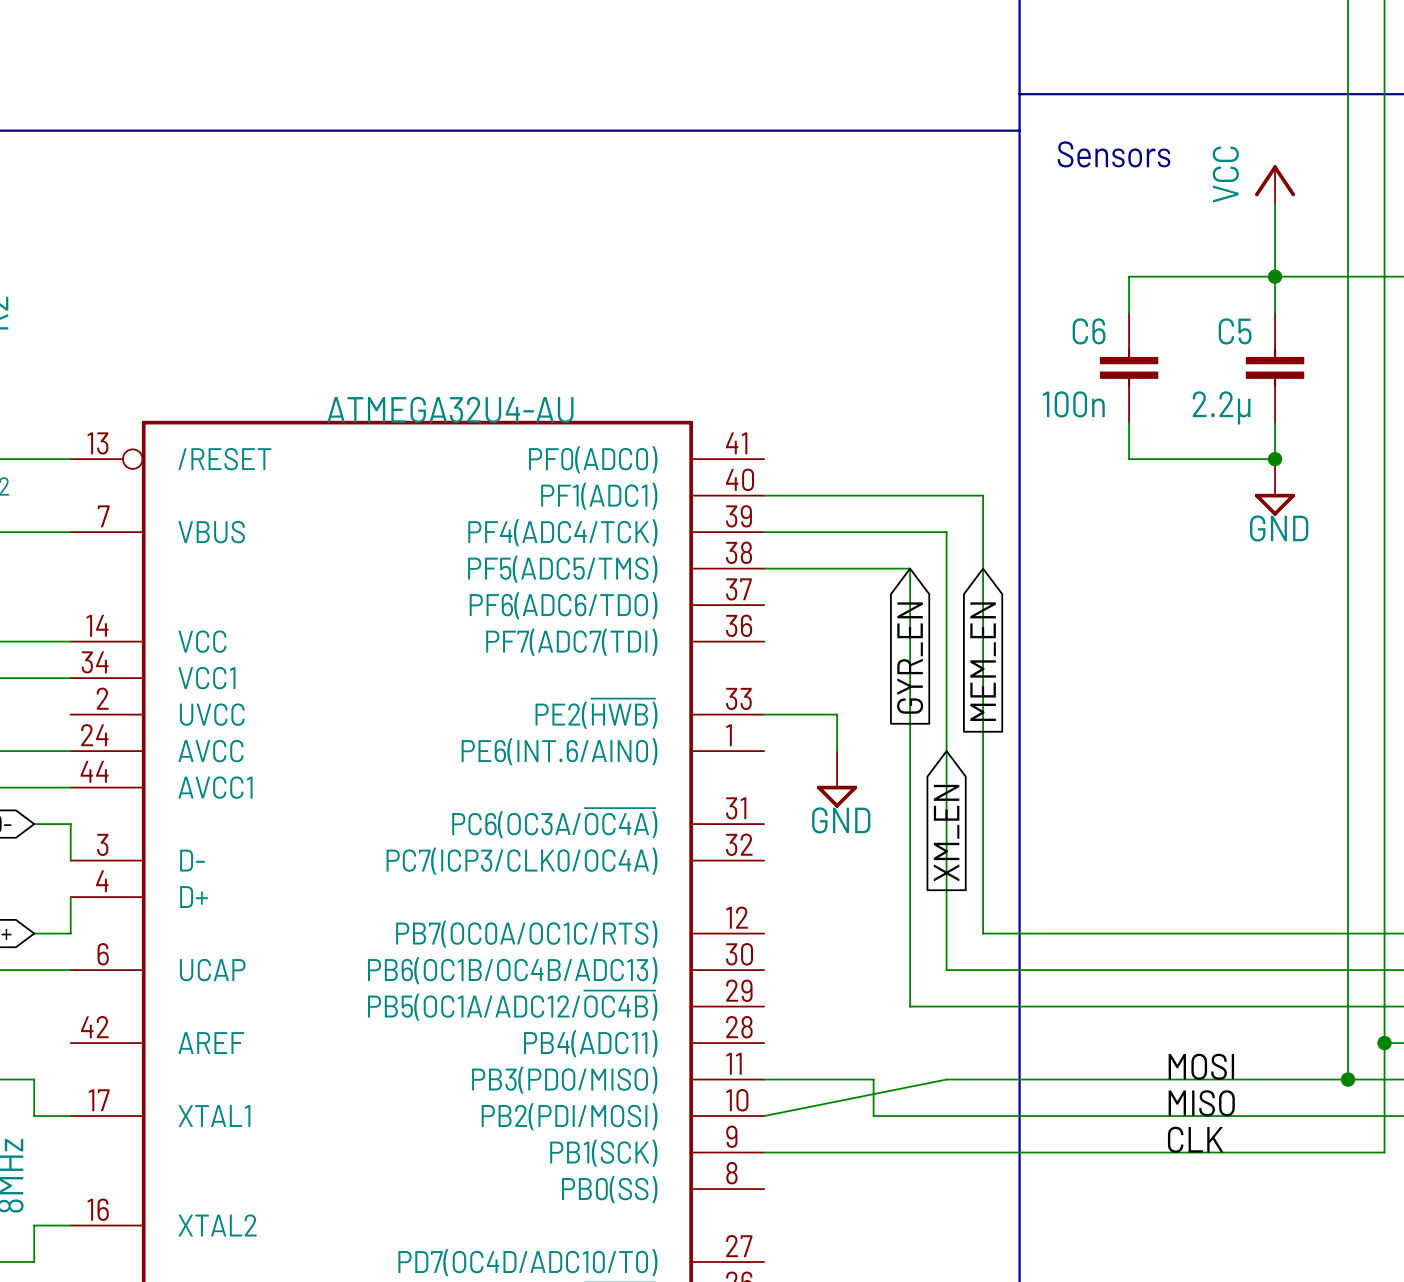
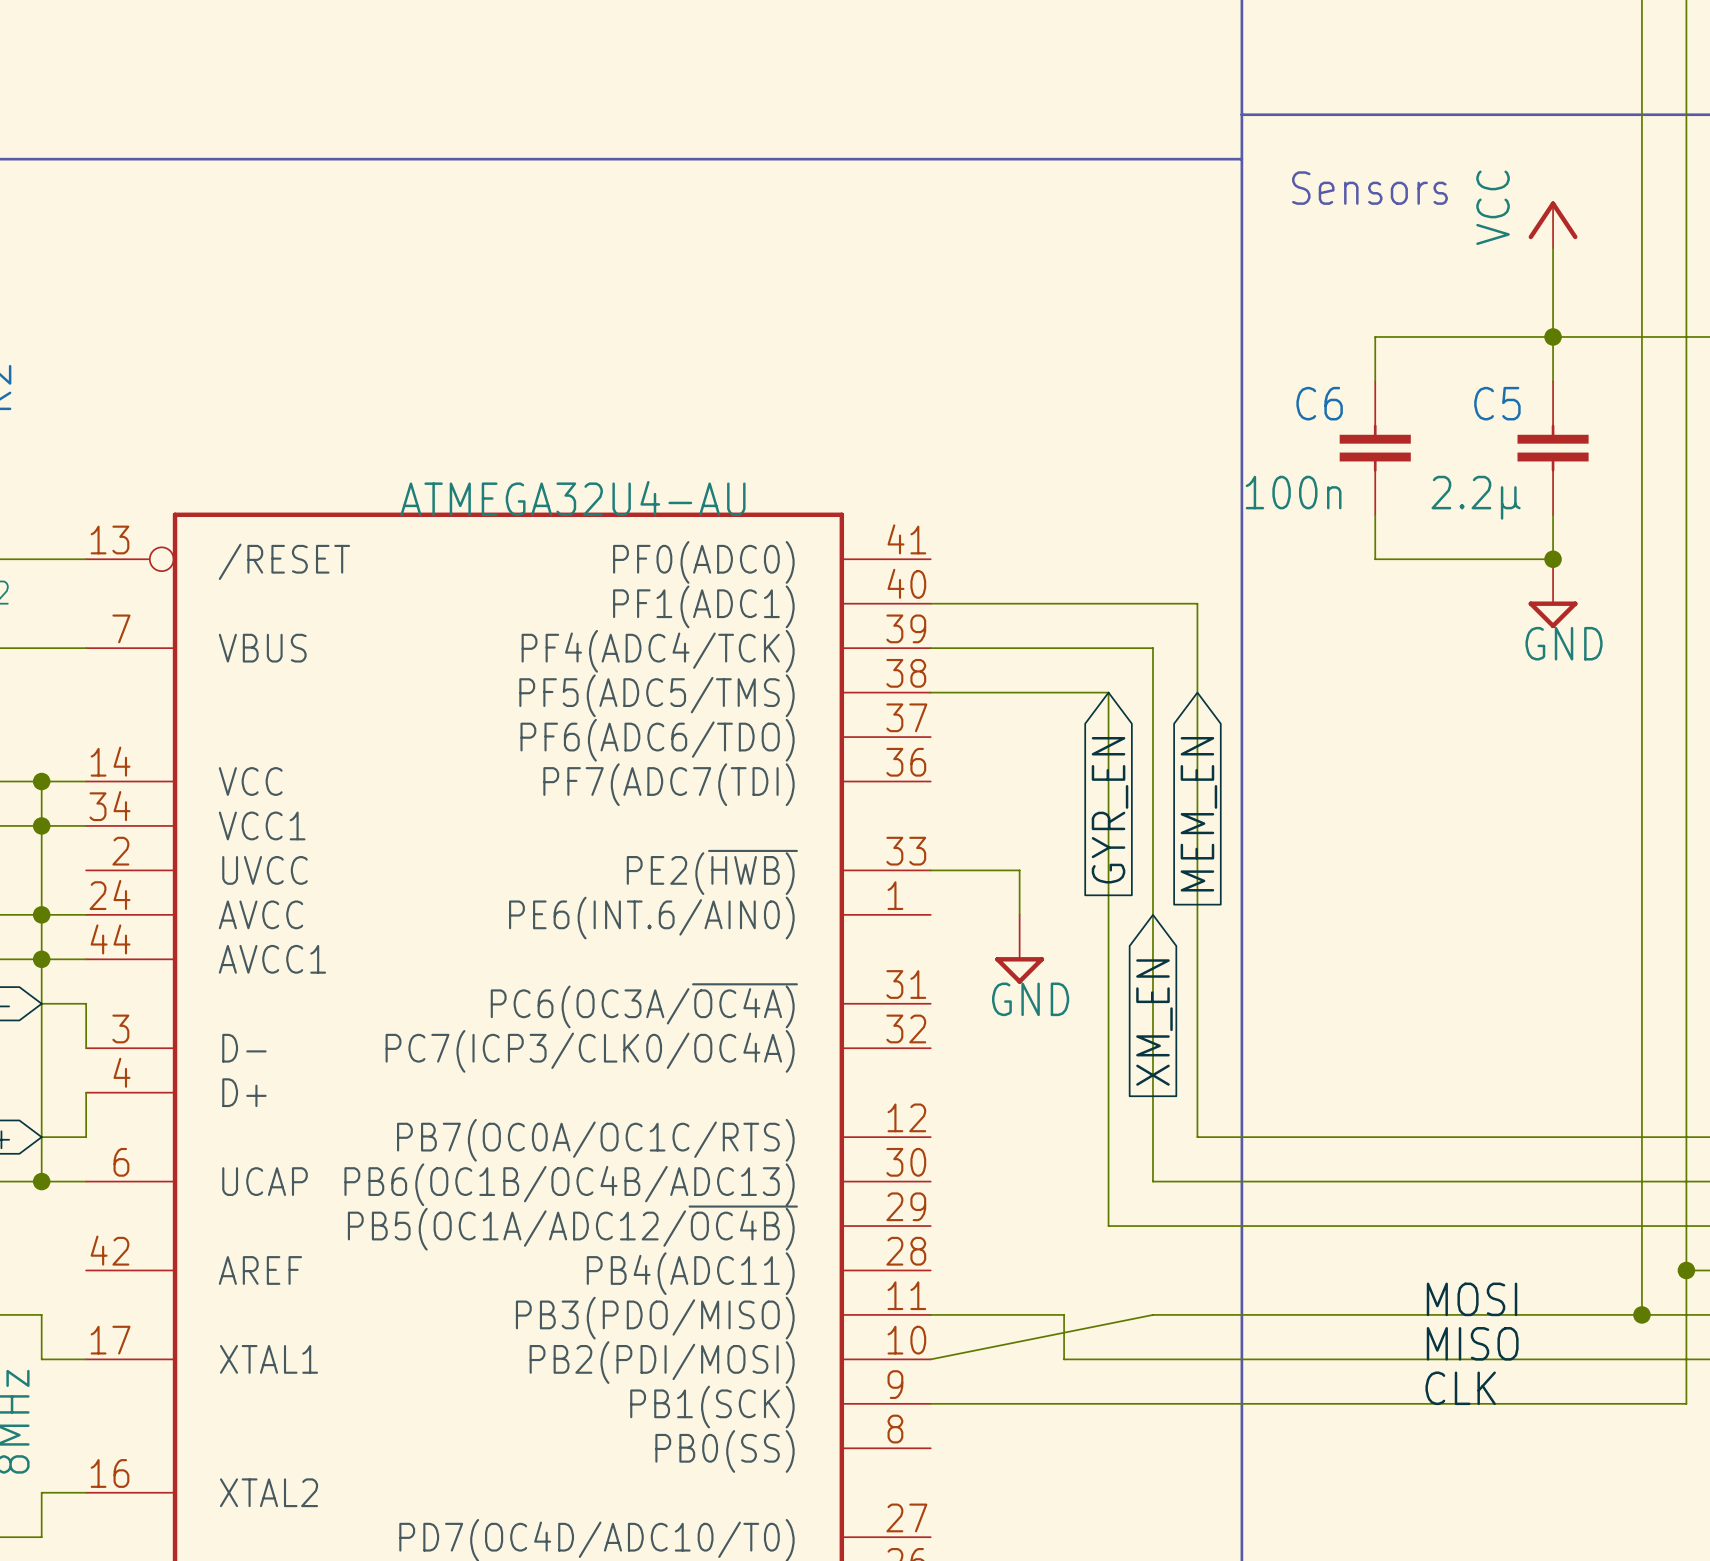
wire: none -> (41, 781) (41, 1181)
junction: none -> (41, 781)
junction: none -> (41, 825)
junction: none -> (41, 914)
junction: none -> (41, 959)
junction: none -> (41, 1181)

